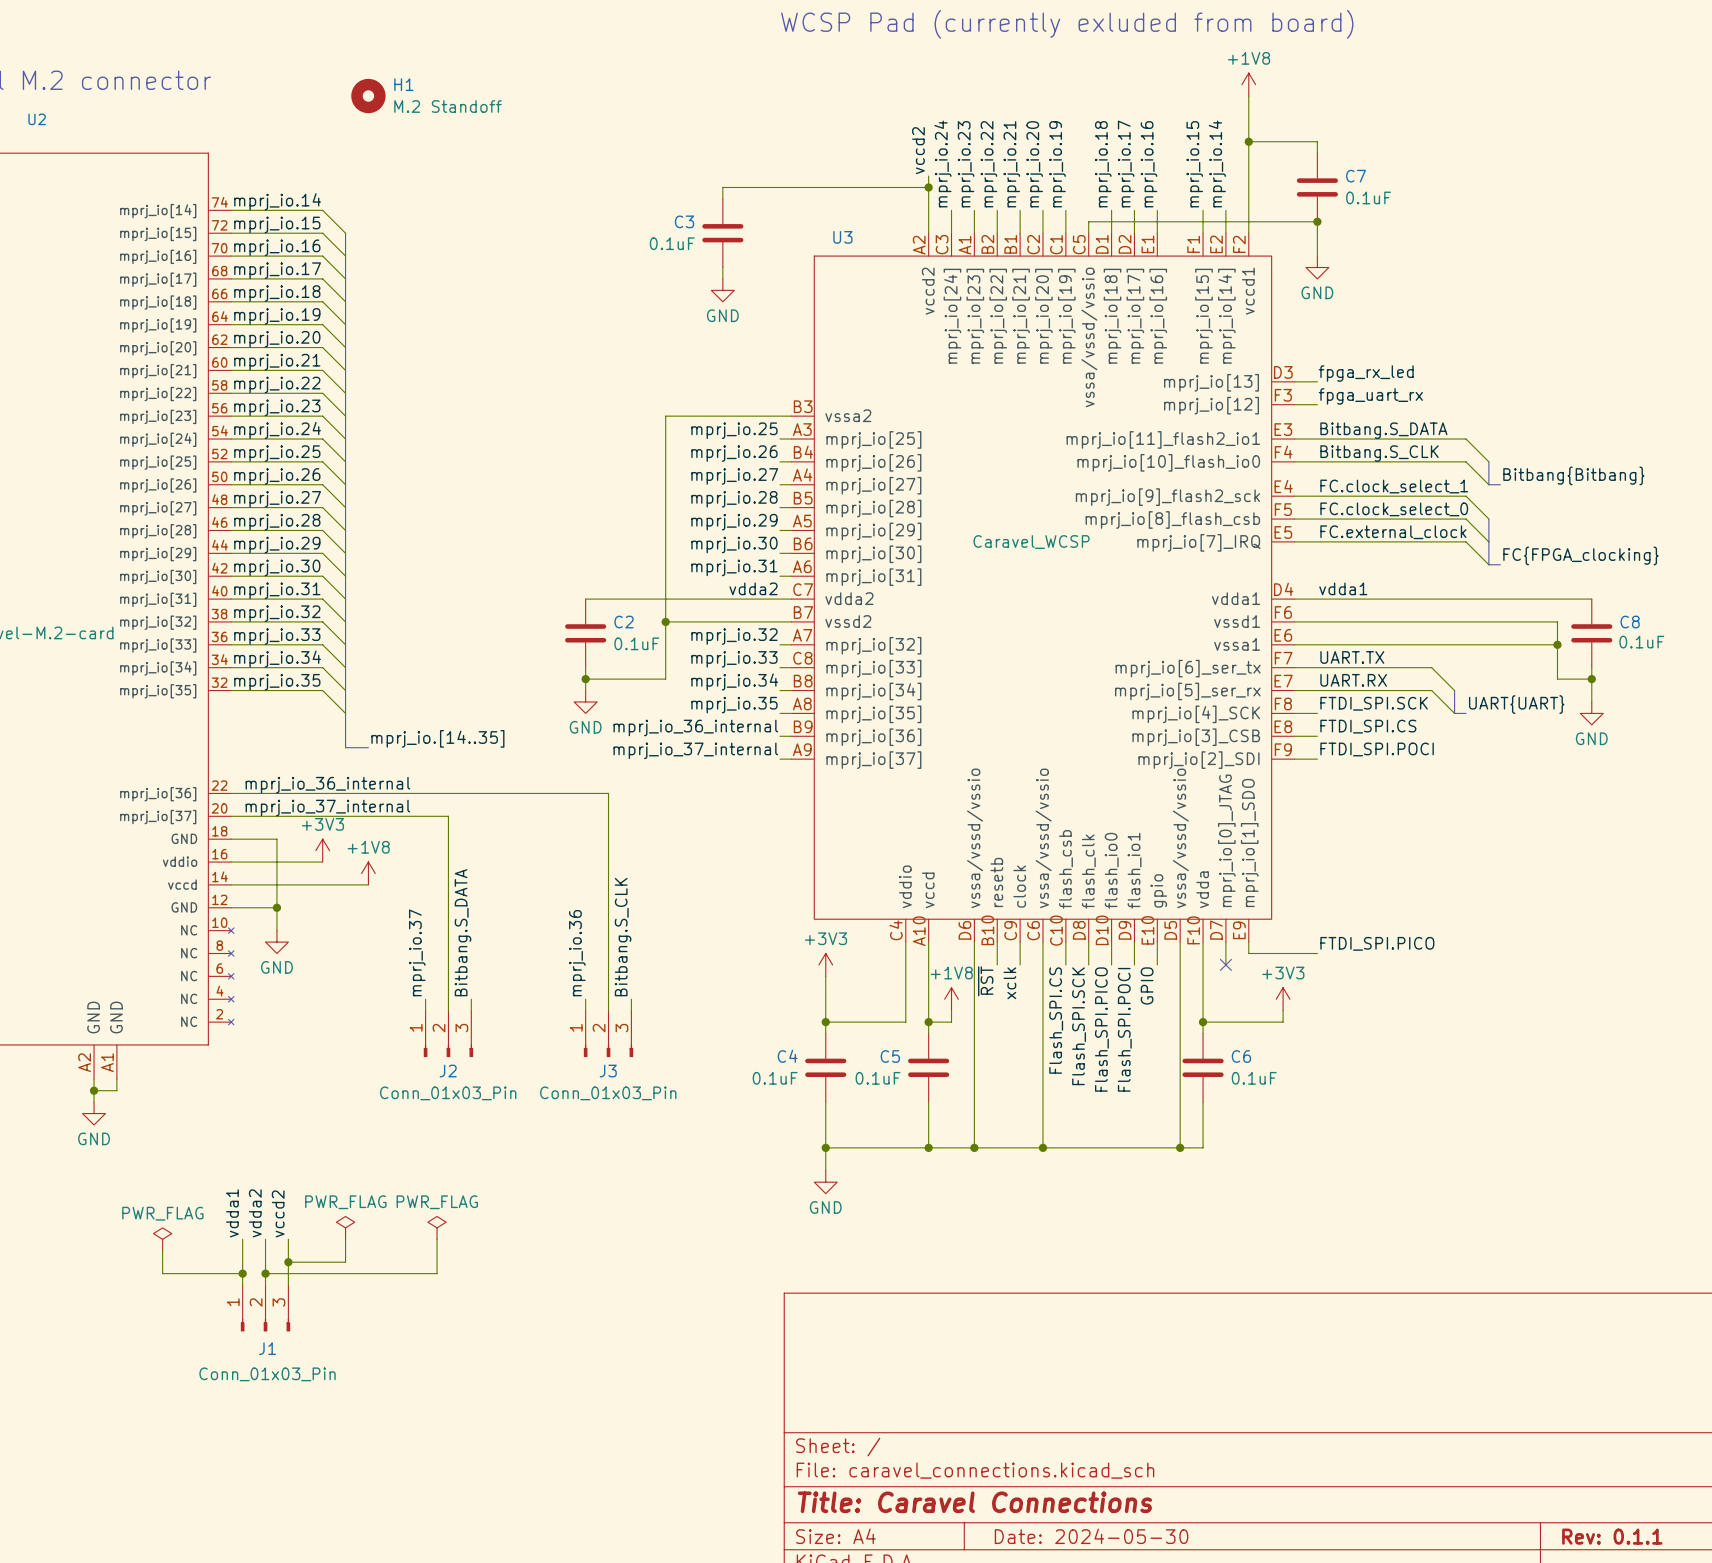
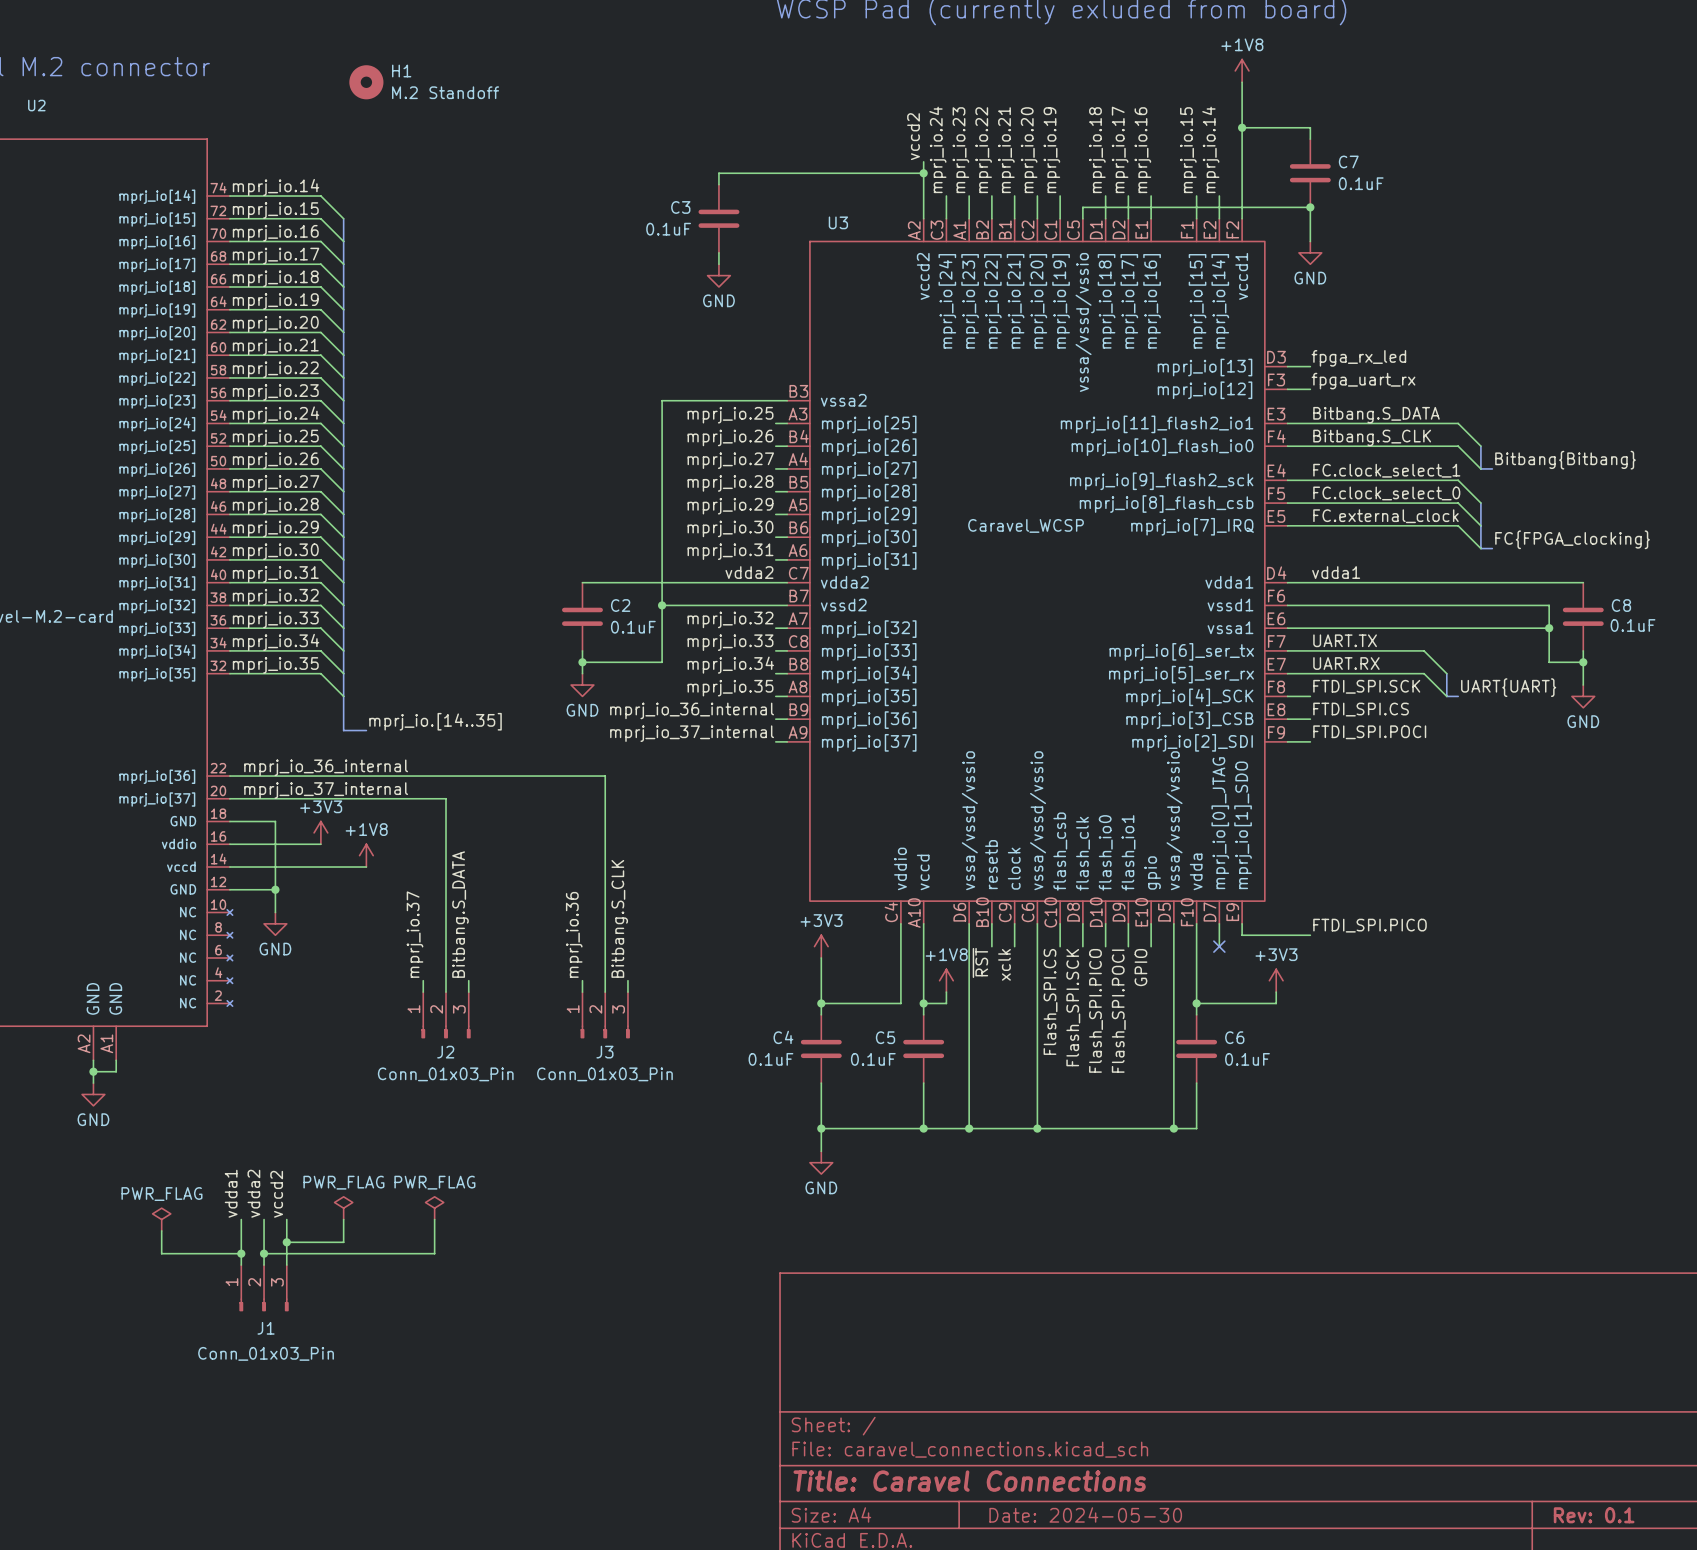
title block: Rev: 0.1.1 (1612, 1536) -> Rev: 0.1 (1594, 1515)

